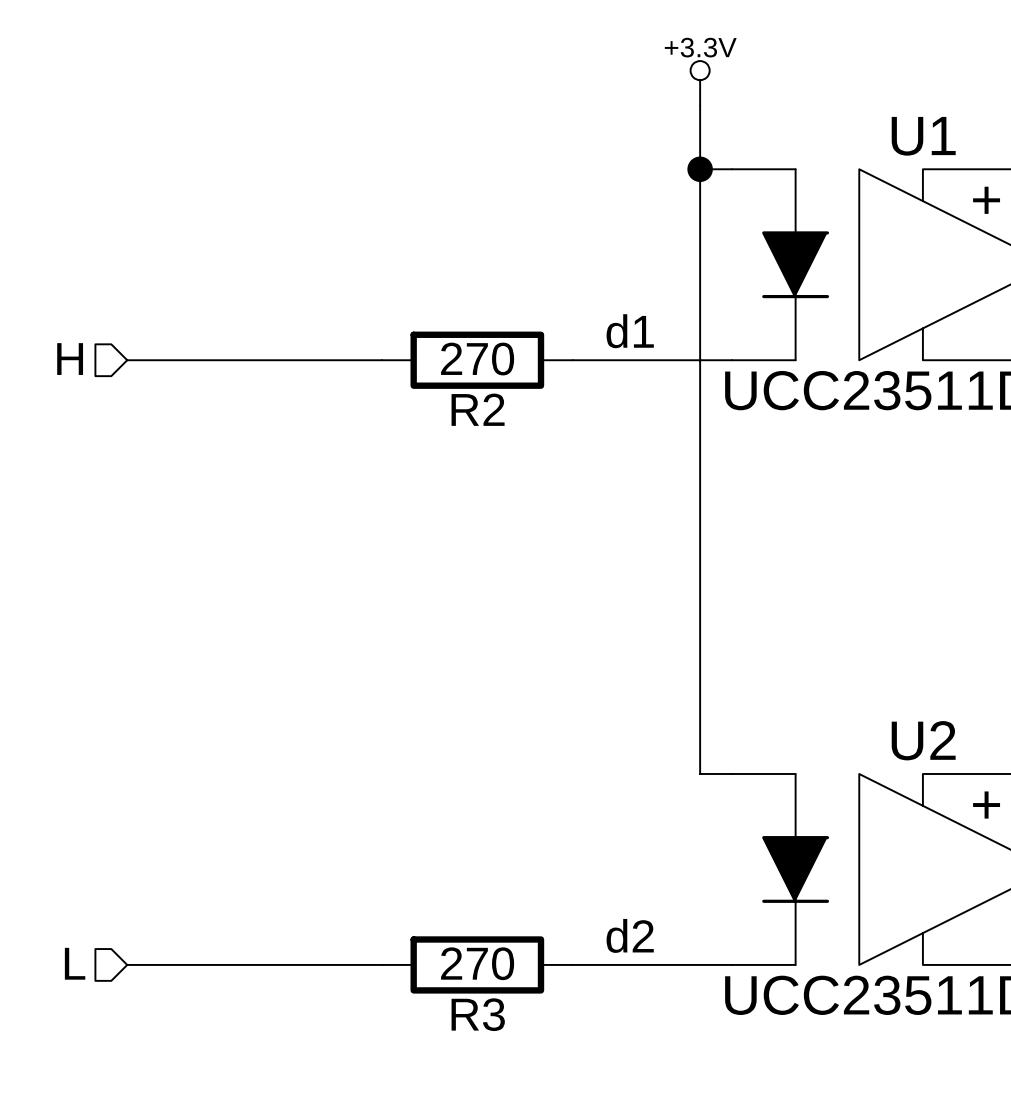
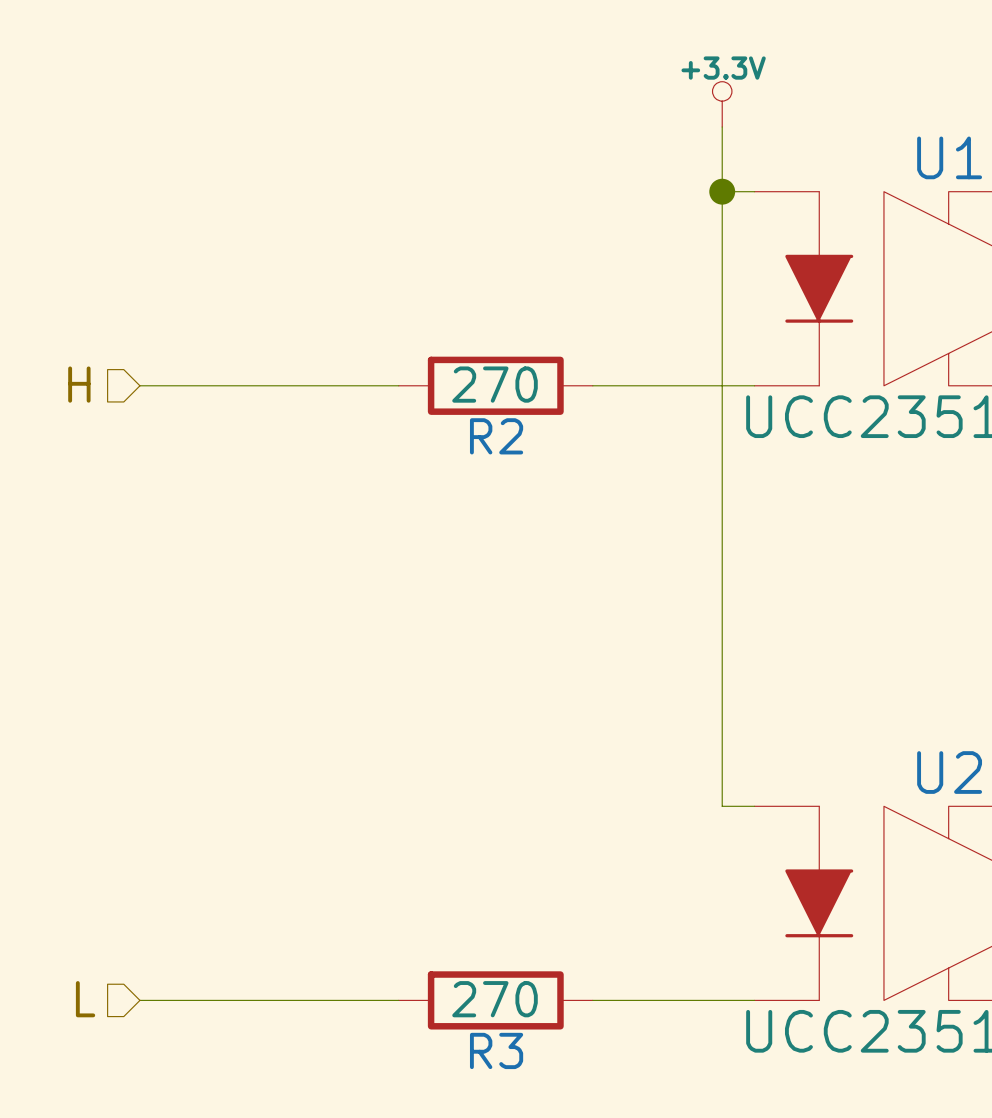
label: d1 (630, 331) -> none
label: d2 (630, 935) -> none

